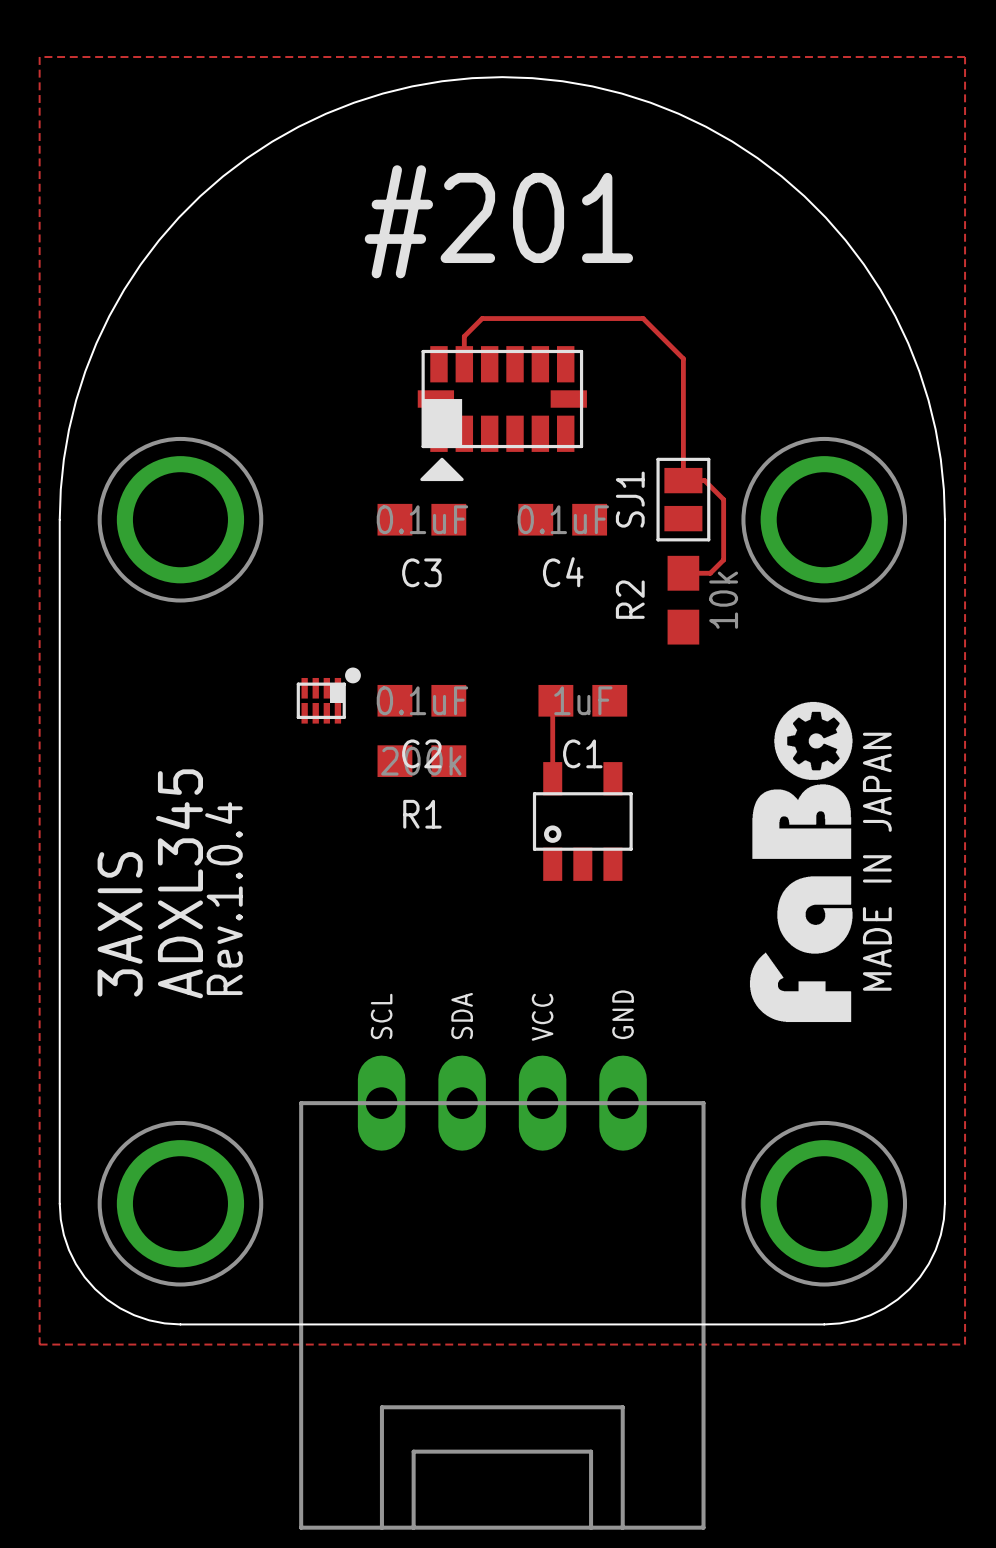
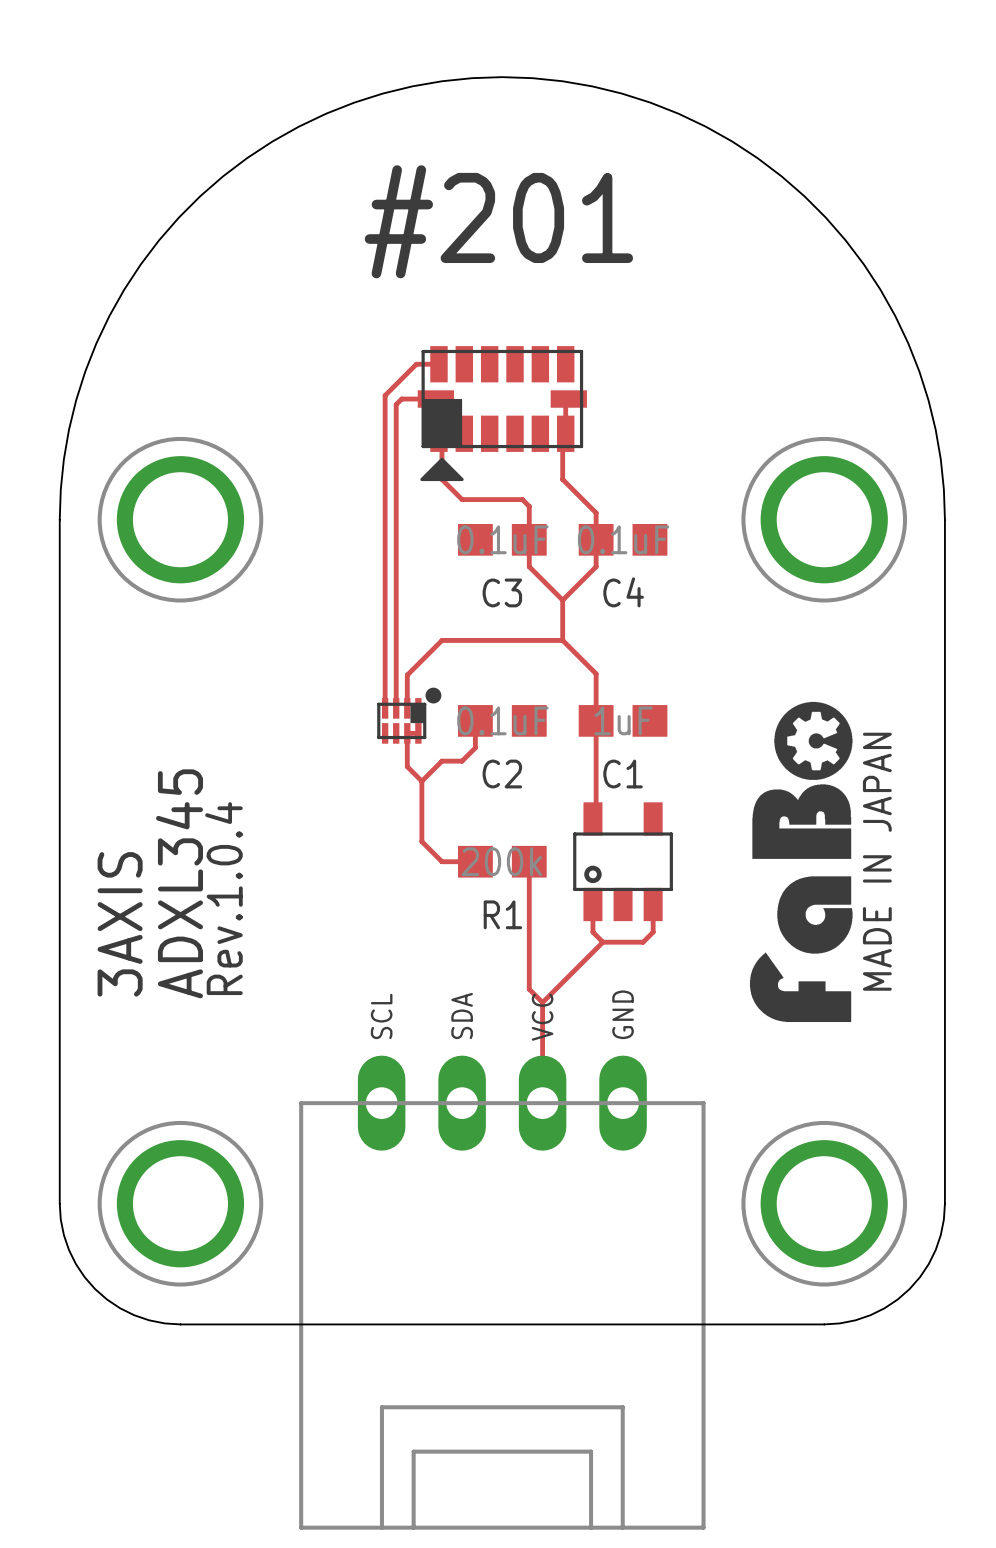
zone outline: (39, 57) (965, 57) (965, 1344) (39, 1344) (39, 57) -> none
track: none -> (438, 364) (416, 364) (385, 395) (385, 708)
track: (464, 364) (464, 336) (482, 318) (643, 318) (683, 358) (683, 480) (704, 480) (723, 499) (723, 559) (710, 573) (683, 573) -> none
track: none -> (435, 399) (401, 399) (396, 404) (396, 708)
track: none -> (568, 399) (565, 402) (565, 433) (562, 436) (562, 479) (596, 512) (596, 566) (562, 600)
track: none -> (438, 433) (441, 436) (441, 479) (462, 499) (522, 499) (529, 506) (529, 566) (562, 600)
SJ1: (683, 499) -> none
C3 position: (421, 519) -> (502, 539)
C4 position: (562, 519) -> (623, 539)
track: none -> (562, 600) (562, 640)
R2: 10k (683, 600) -> none
track: none -> (562, 640) (596, 673) (596, 815) (592, 818)
track: none -> (562, 640) (441, 640) (407, 675) (407, 708)
part position: (328, 695) -> (409, 715)
C2 position: (421, 700) -> (502, 720)
track: (555, 700) (552, 703) (552, 778) -> none
C1 position: (582, 700) -> (623, 720)
track: none -> (475, 720) (475, 747) (462, 761) (441, 761) (421, 781)
track: none -> (418, 733) (407, 733) (407, 766) (421, 781)
R1 position: (421, 761) -> (502, 861)
track: none -> (421, 781) (421, 841) (441, 861) (475, 861)
part position: (582, 821) -> (623, 861)
track: none -> (529, 861) (529, 989) (542, 1002)
track: none -> (592, 904) (592, 932) (602, 942)
track: none -> (653, 904) (653, 932) (643, 942) (602, 942)
track: none -> (602, 942) (542, 1002)
track: none -> (542, 1002) (542, 1103)

